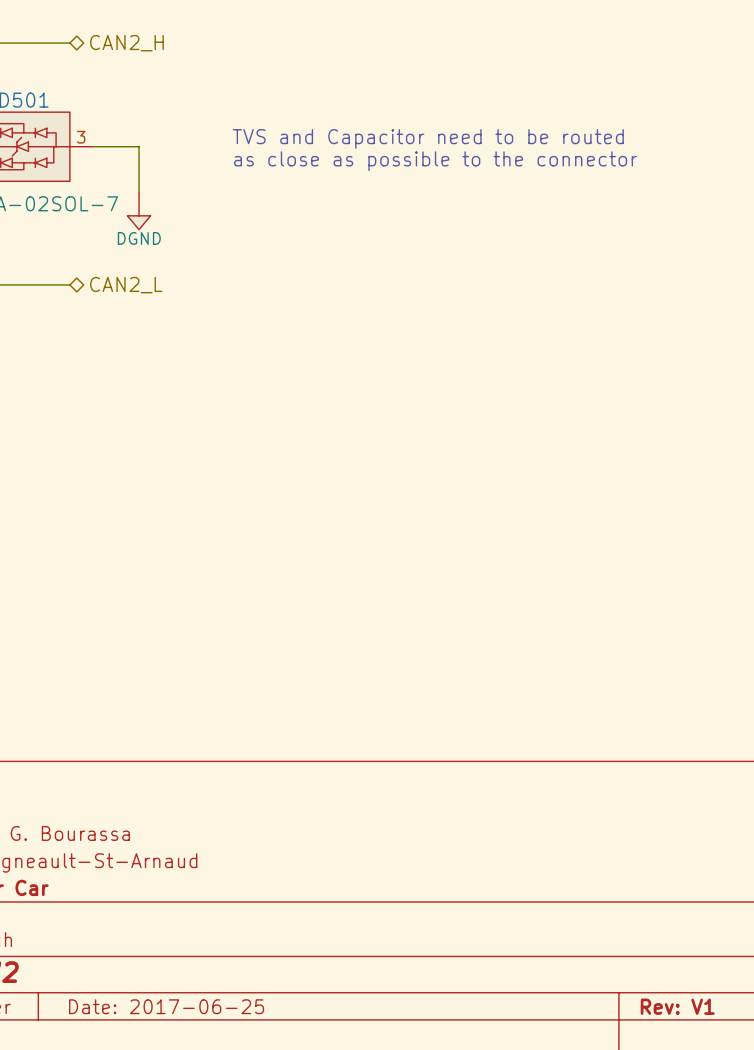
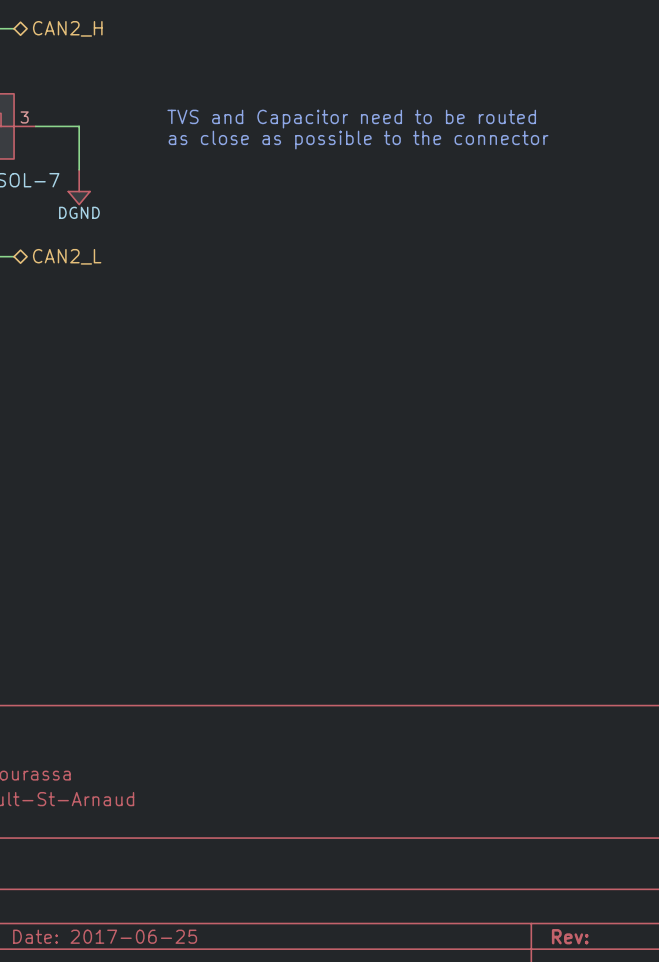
title block: Rev: V1 (677, 1006) -> Rev: (570, 936)

